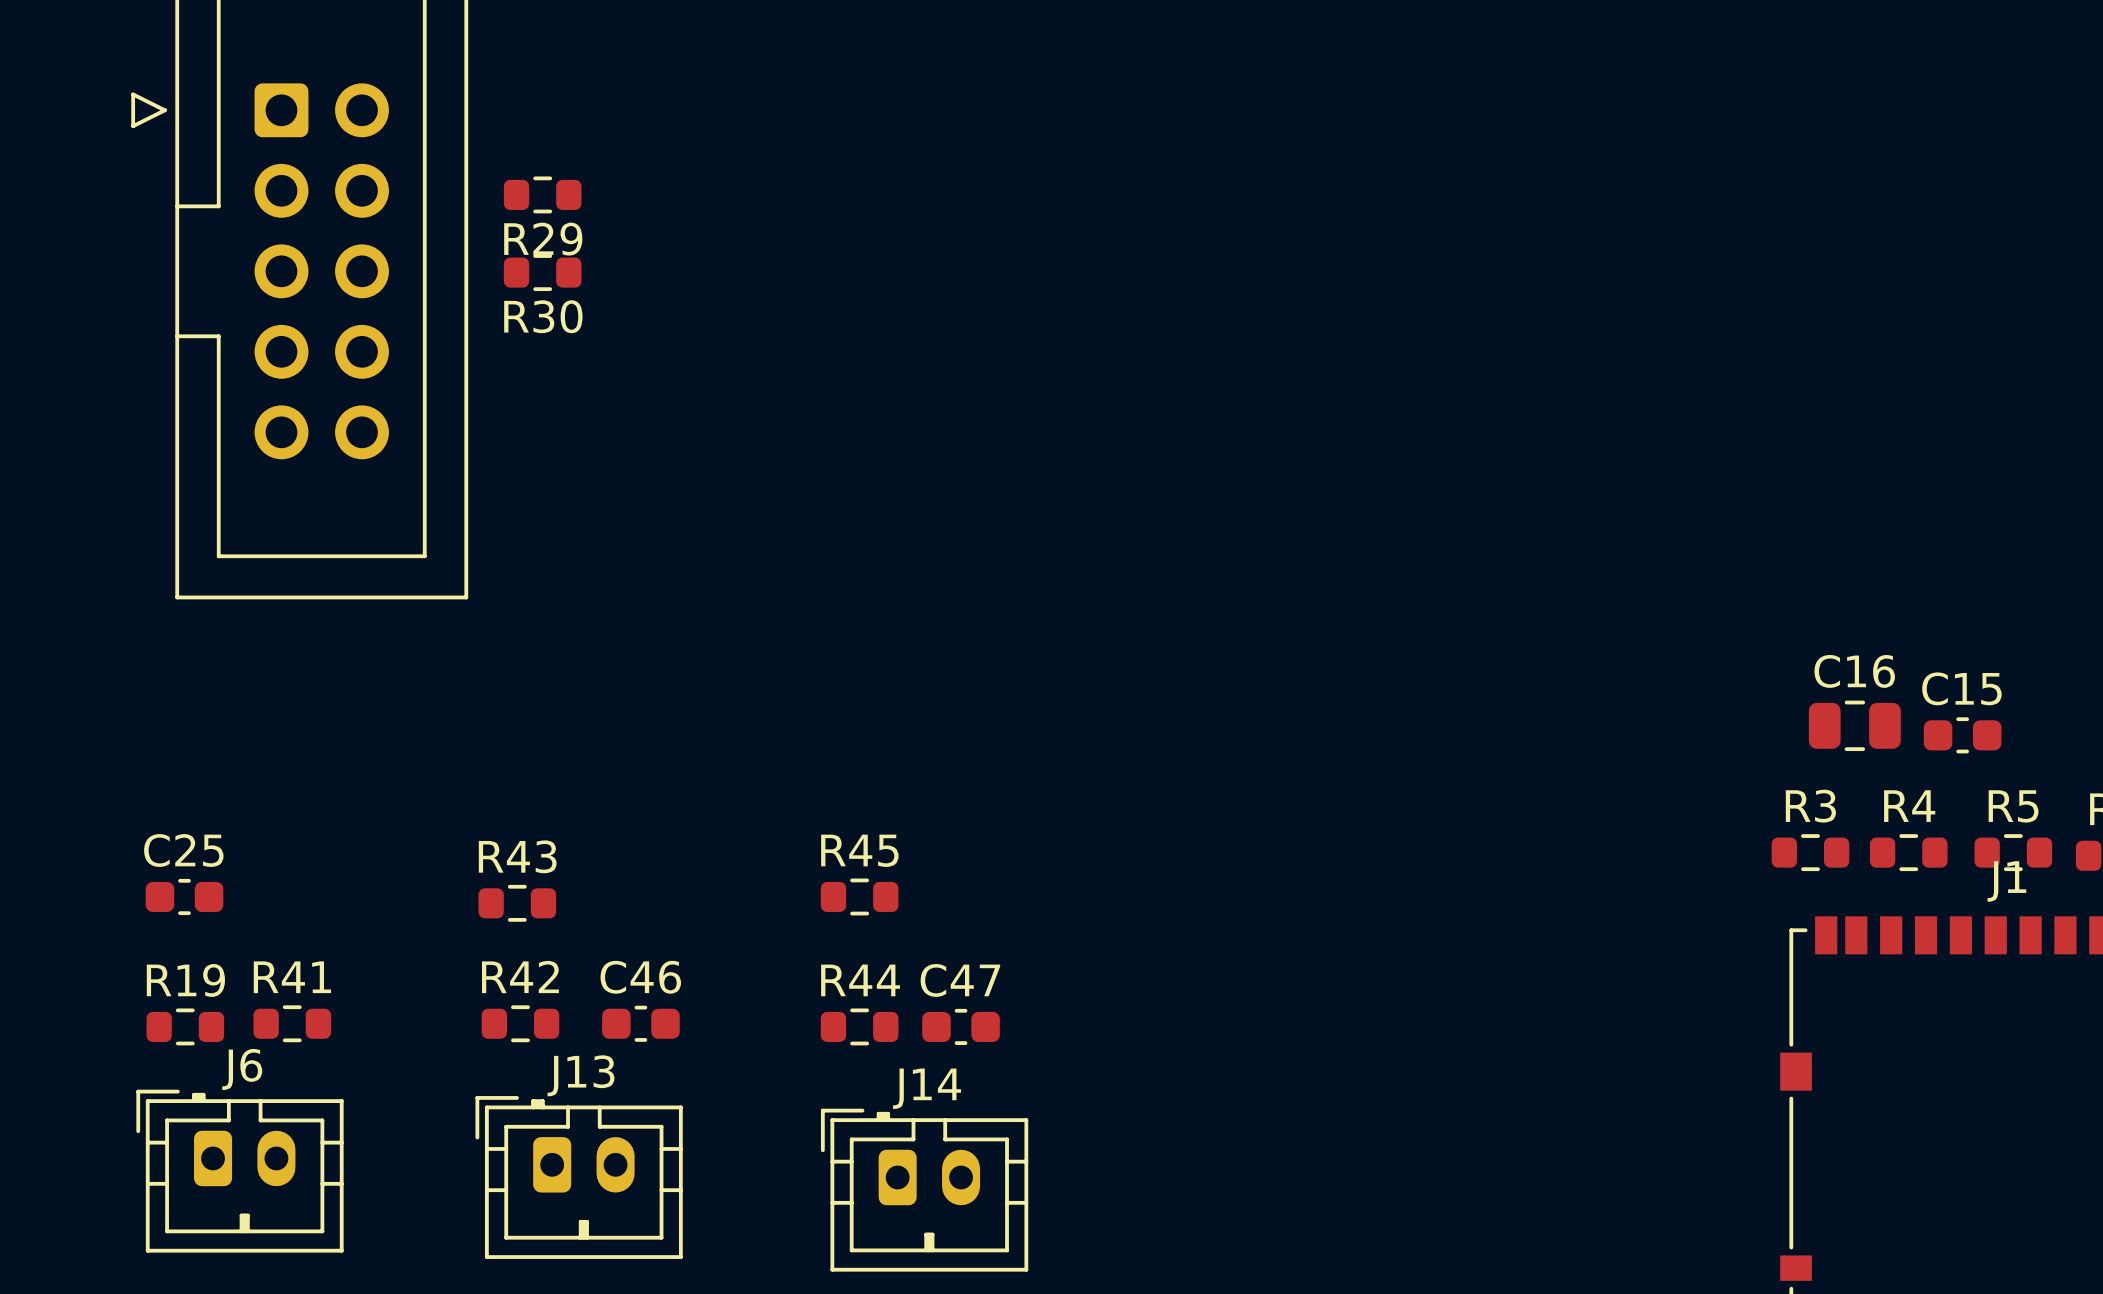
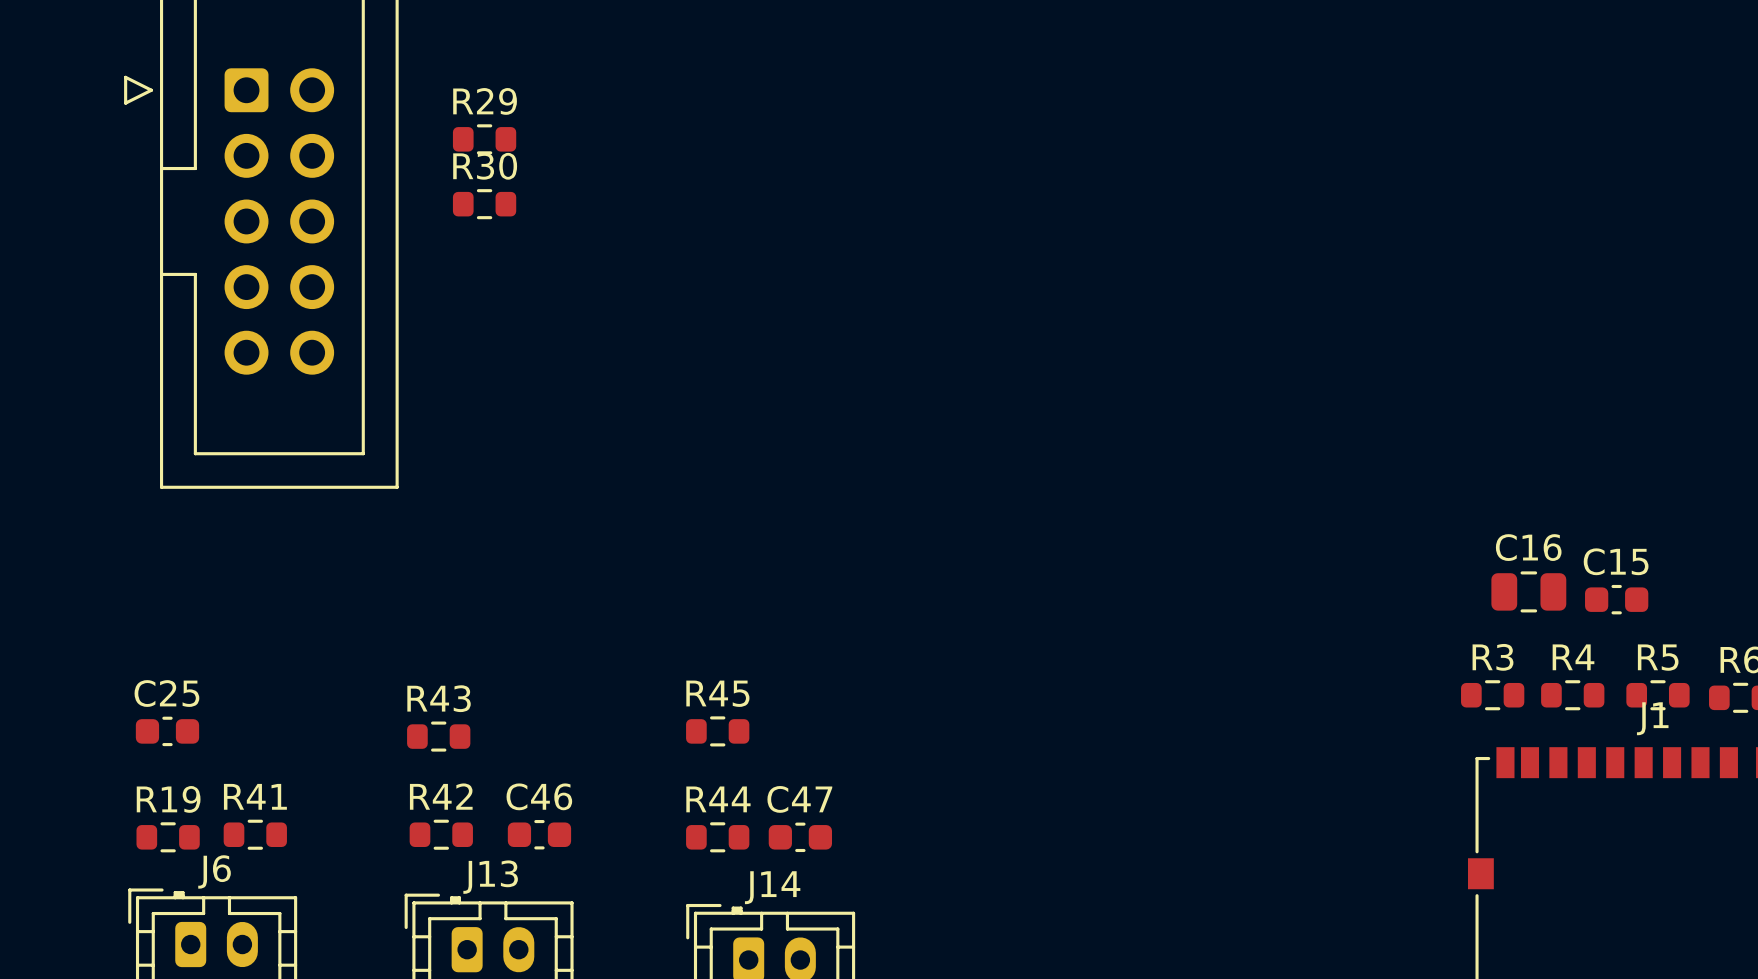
R29 position: (542, 194) -> (484, 139)
R29 name position: R29 (543, 239) -> R29 (485, 101)
R30 position: (542, 272) -> (484, 204)
R30 name position: R30 (543, 316) -> R30 (485, 166)

